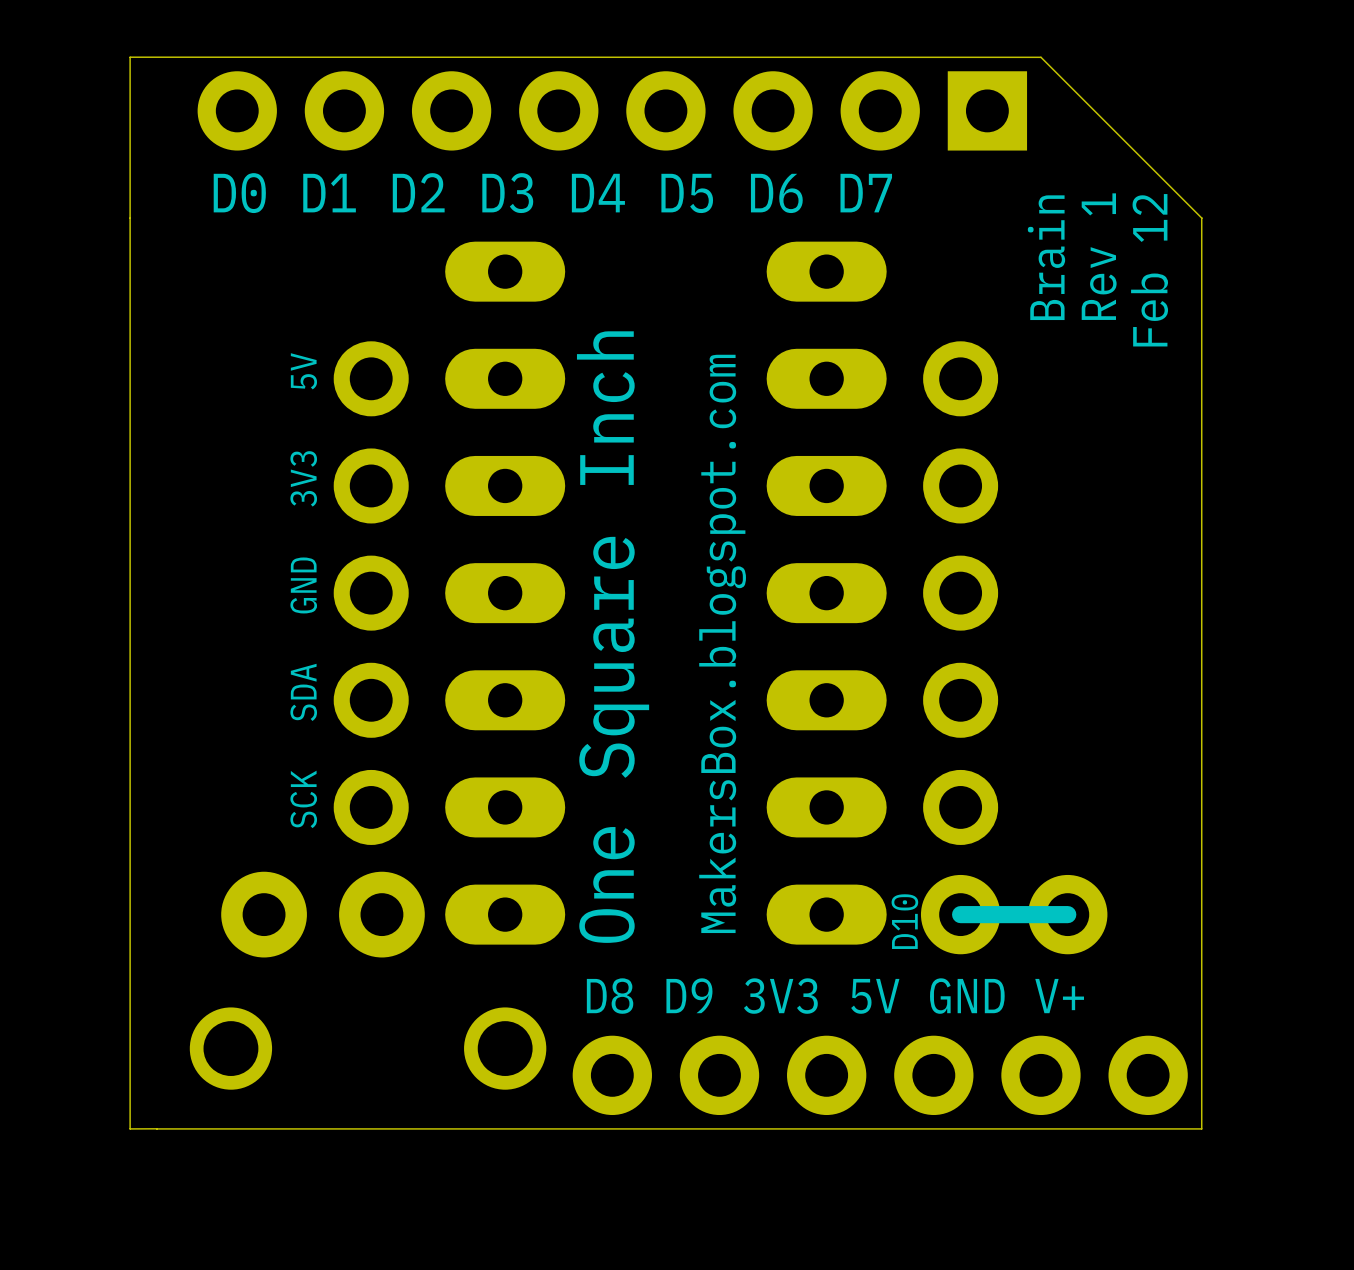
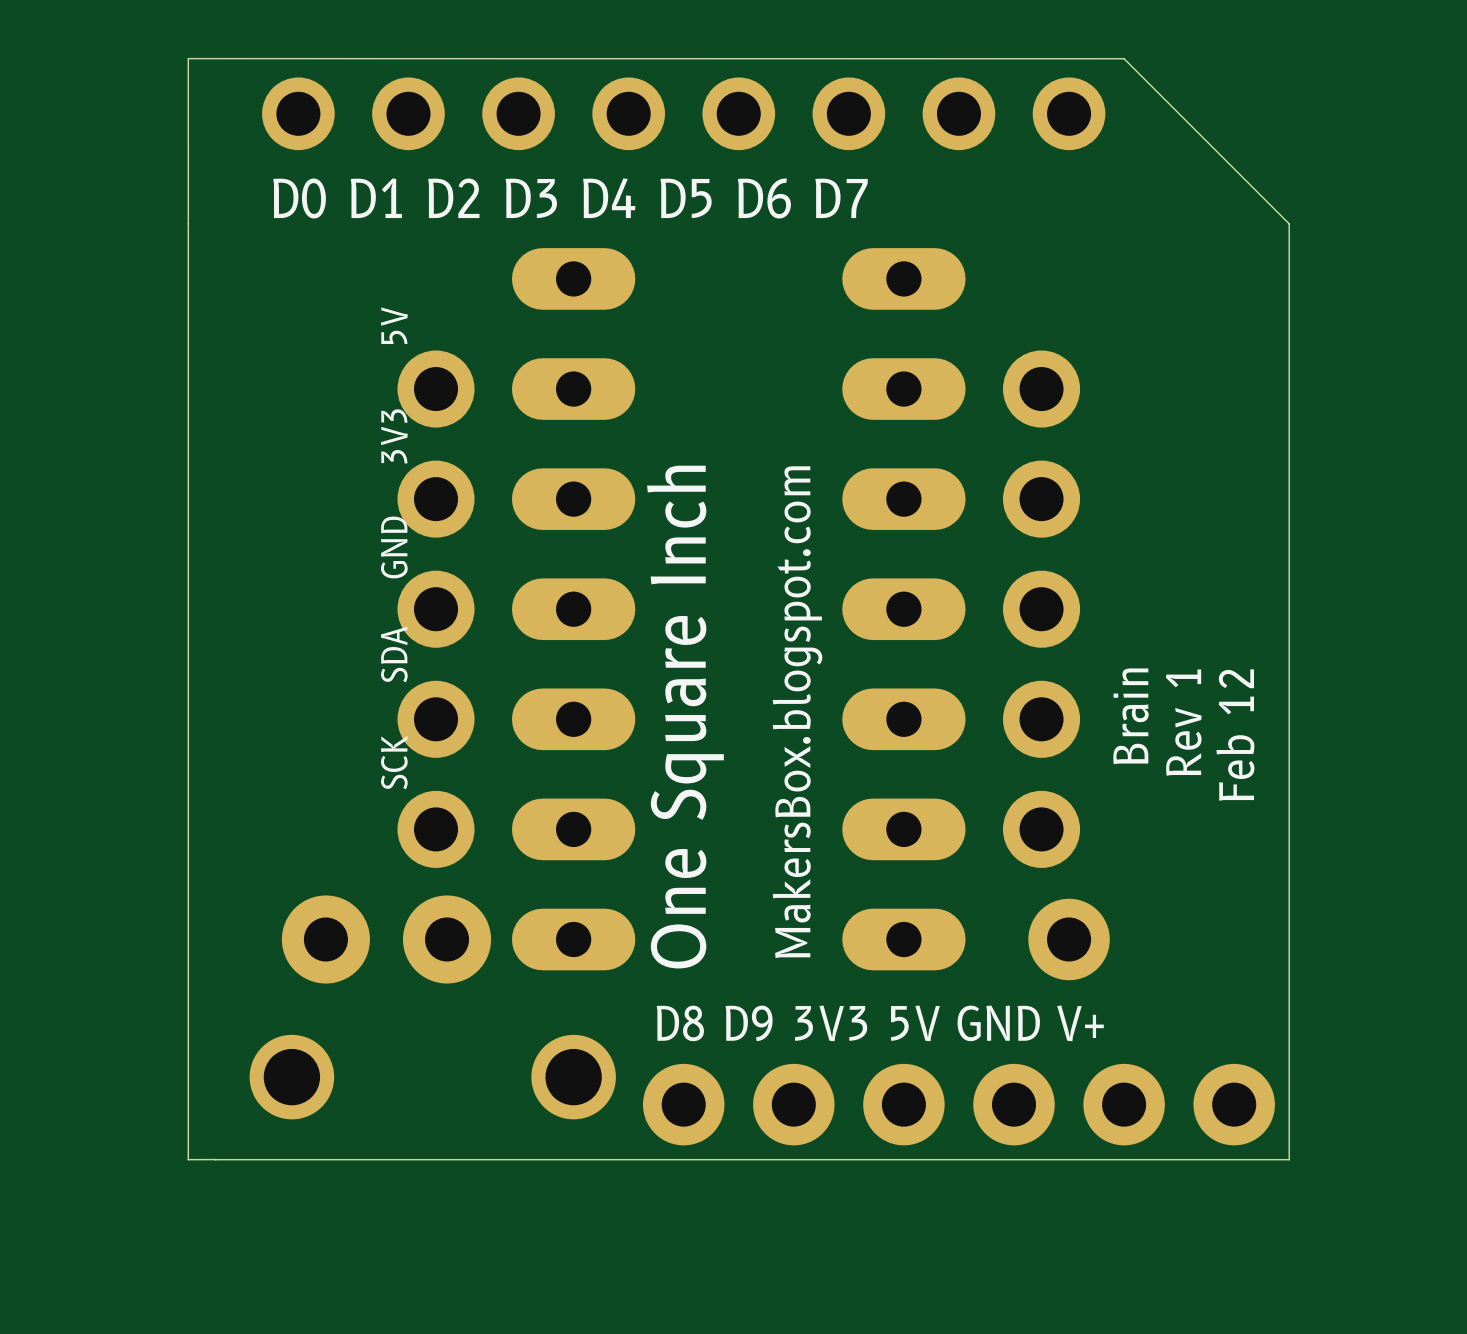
part footprint: [197, 71, 1028, 151] -> [262, 77, 1106, 151]
text position: Rev 1 (1099, 256) -> Rev 1 (1183, 722)
text position: Brain (1046, 257) -> Brain (1131, 716)
text position: Feb 12 (1149, 270) -> Feb 12 (1235, 735)
text position: 5V (303, 371) -> 5V (394, 325)
text position: 3V3 (303, 478) -> 3V3 (394, 436)
text position: GND (303, 585) -> GND (394, 547)
text position: SDA (303, 692) -> SDA (394, 654)
text position: SCK (303, 799) -> SCK (394, 762)
part footprint: [920, 874, 1108, 955] -> [1028, 898, 1110, 981]
line: (1067, 914) (960, 914) -> none
text: D10 (904, 921) -> none

